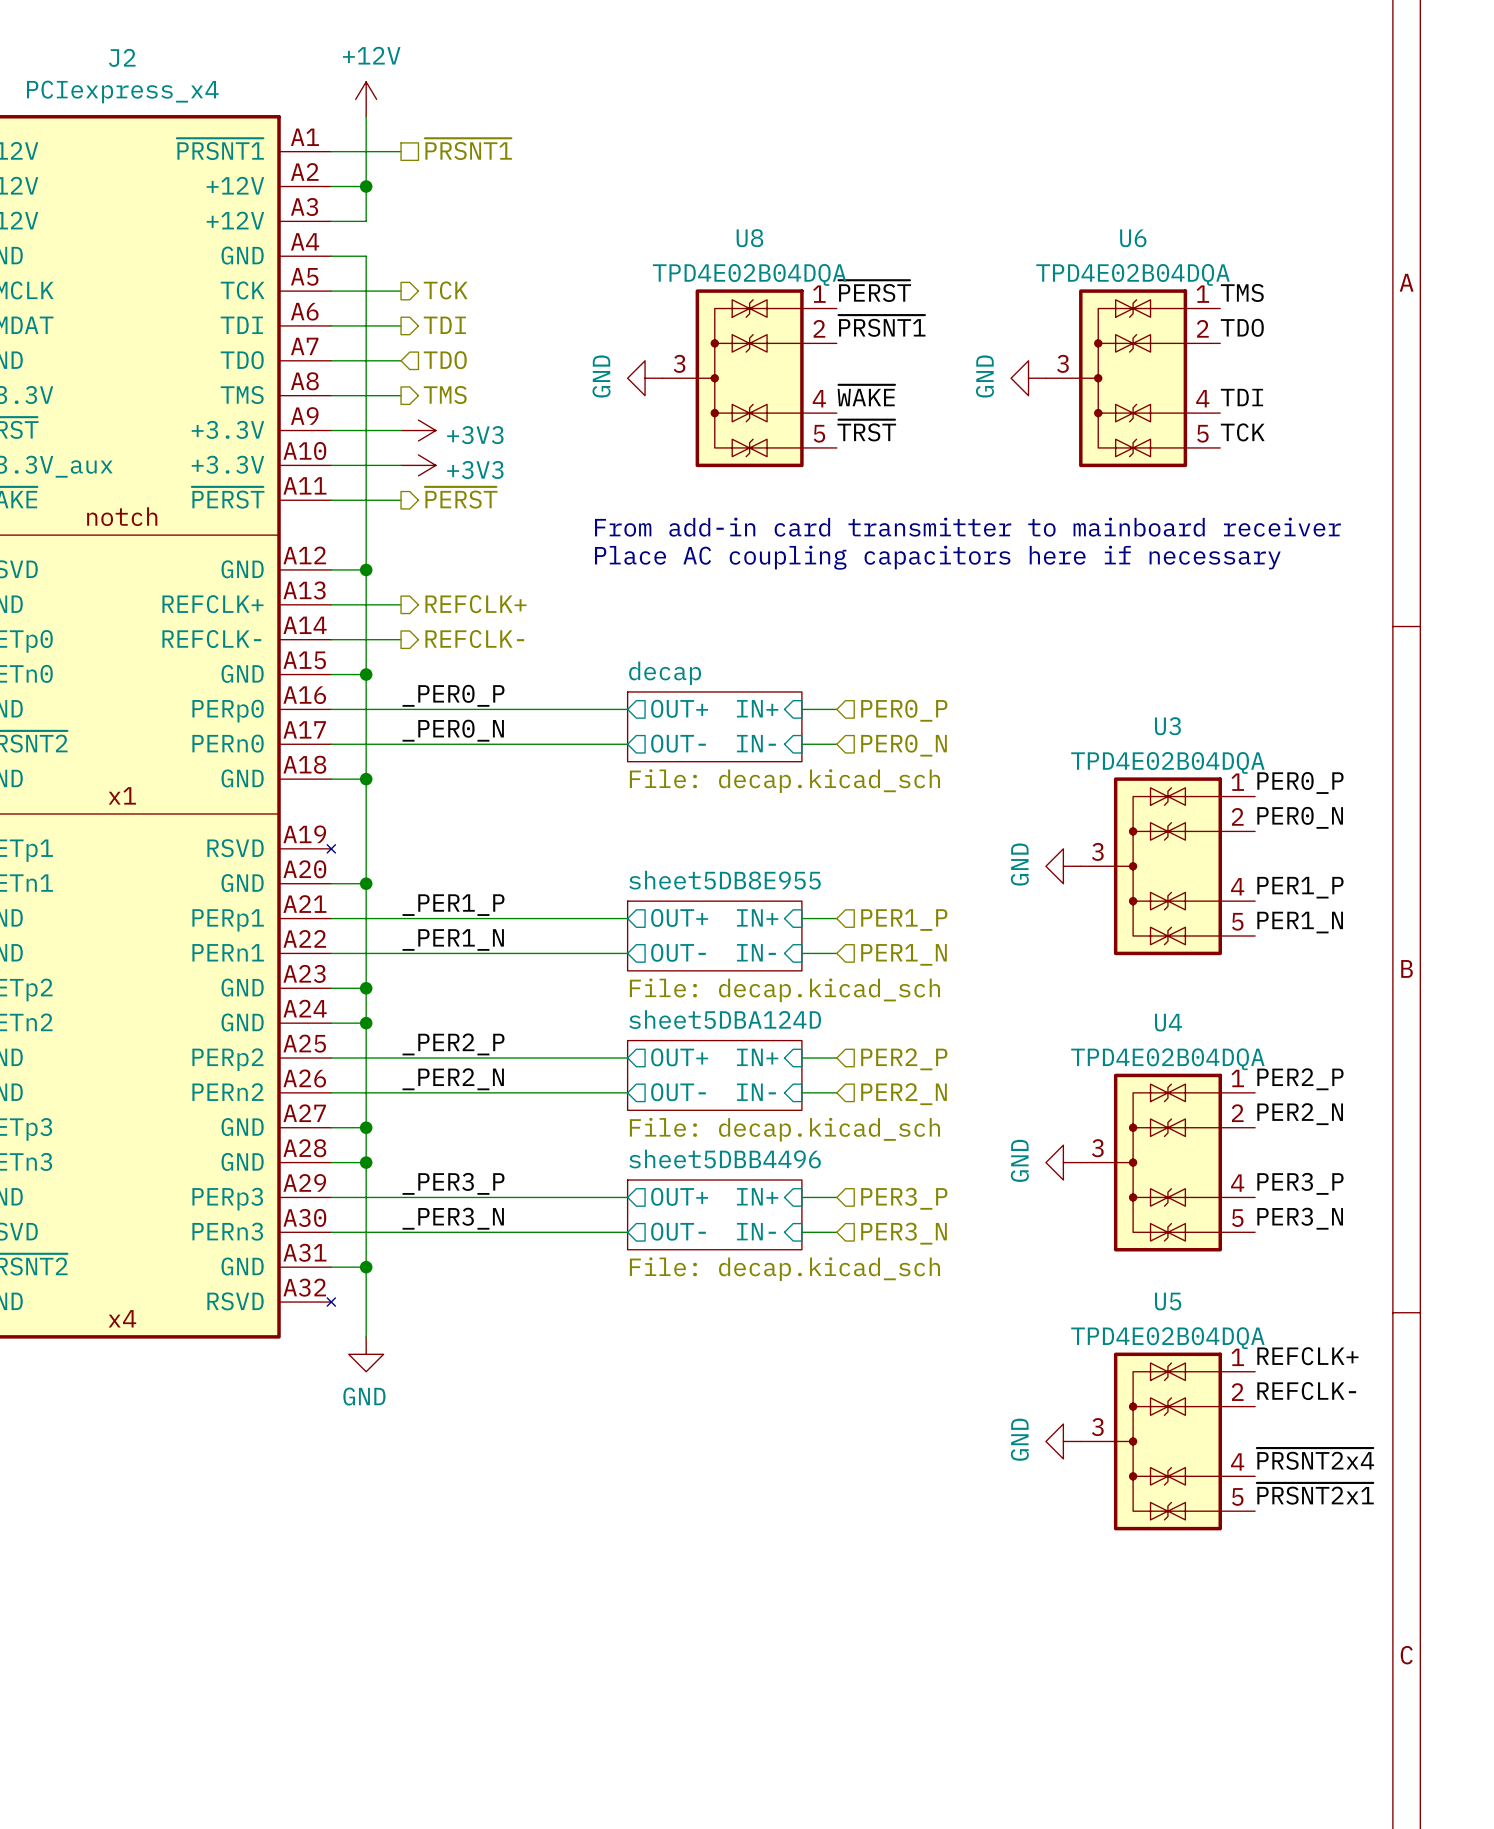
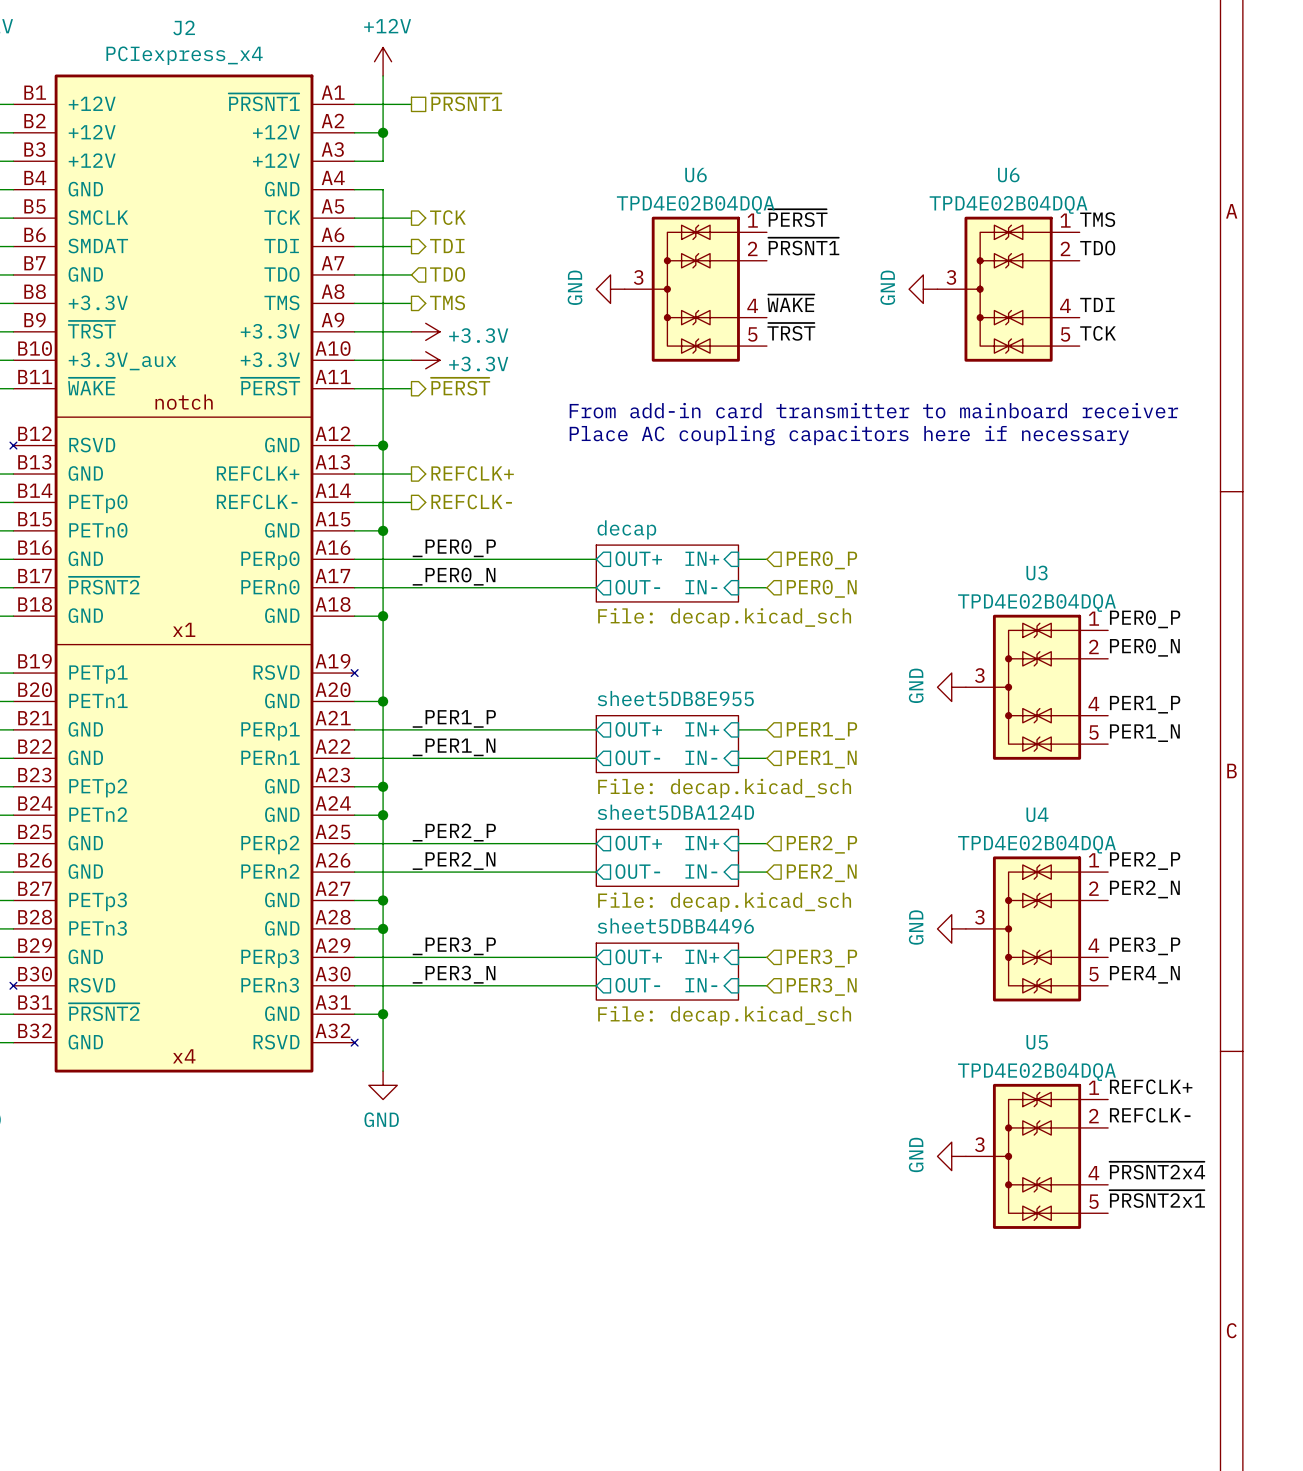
U8 name: U8 (749, 238) -> U6 (695, 175)
power symbol: +3V3 (418, 430) -> +3.3V (425, 331)
power symbol: +3V3 (418, 465) -> +3.3V (425, 360)
label: PER3_N (1300, 1218) -> PER4_N (1144, 974)

